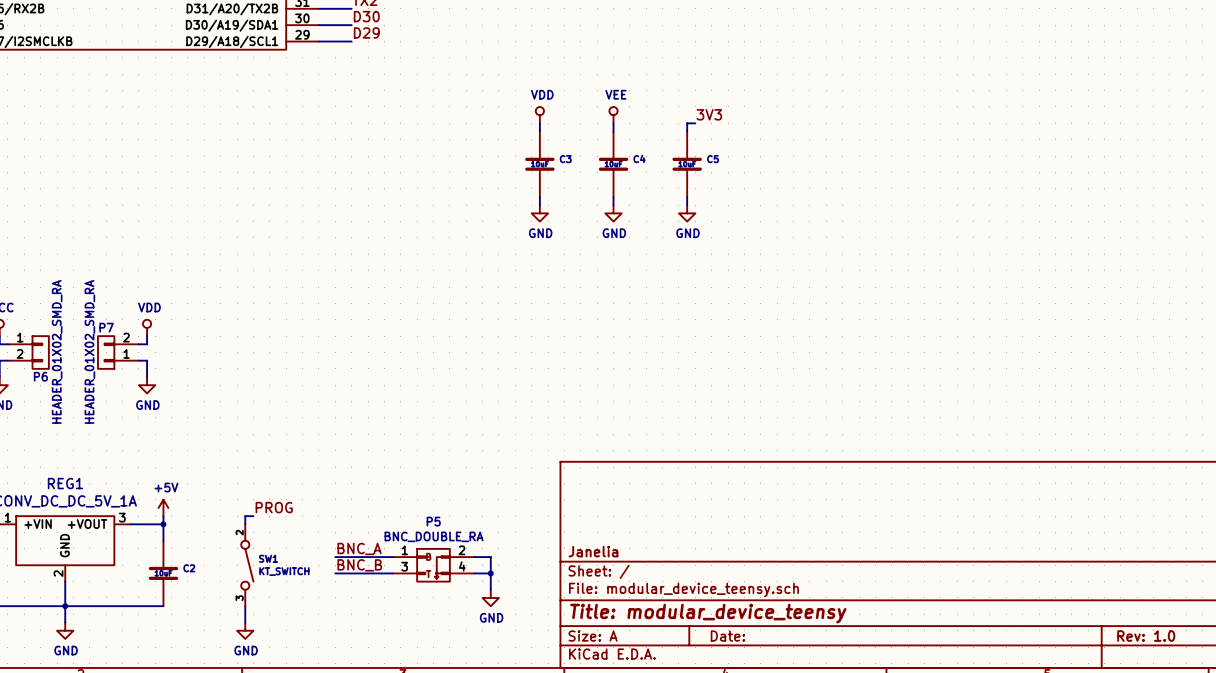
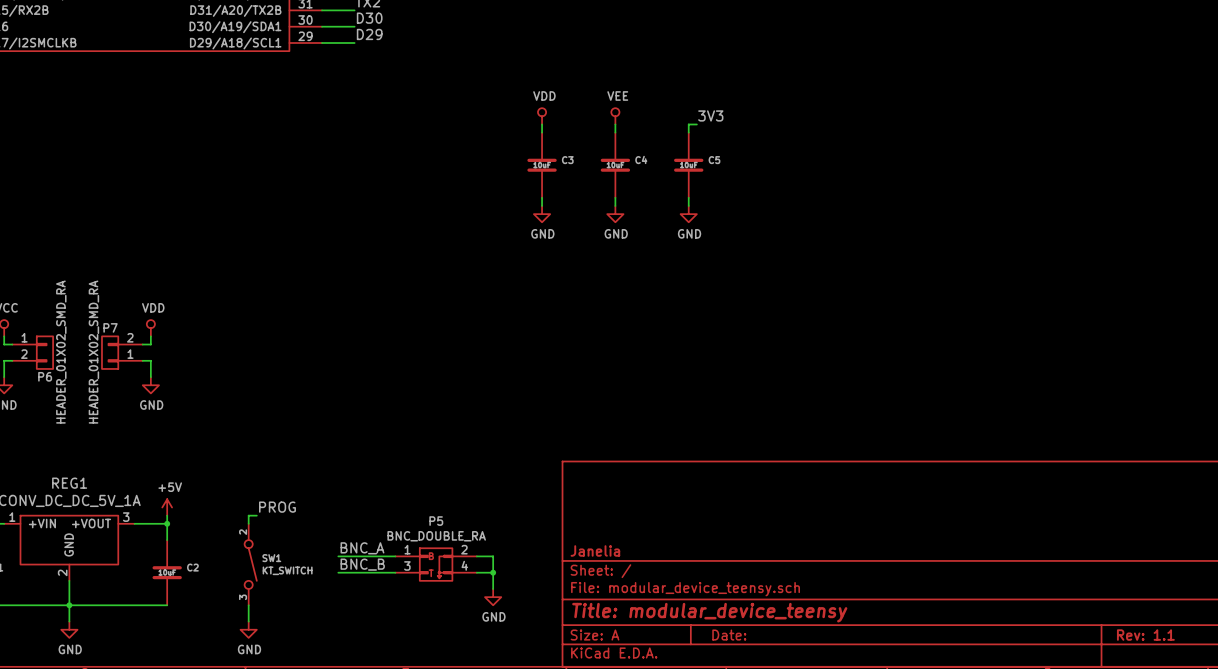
title block: Rev: 1.0 (1146, 636) -> Rev: 1.1 (1145, 635)

